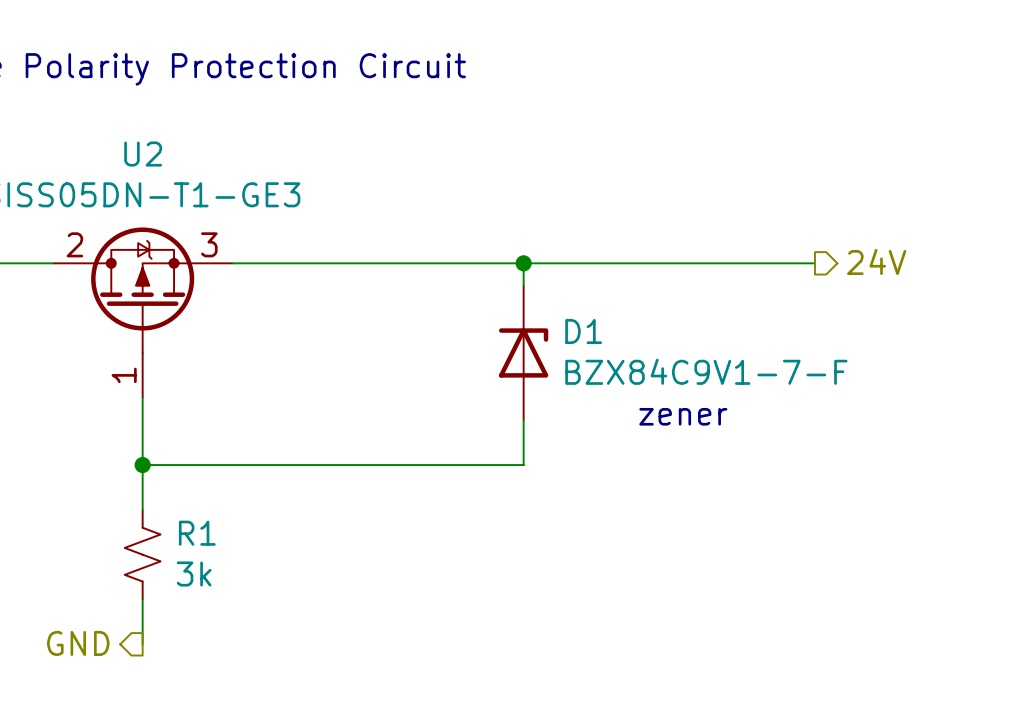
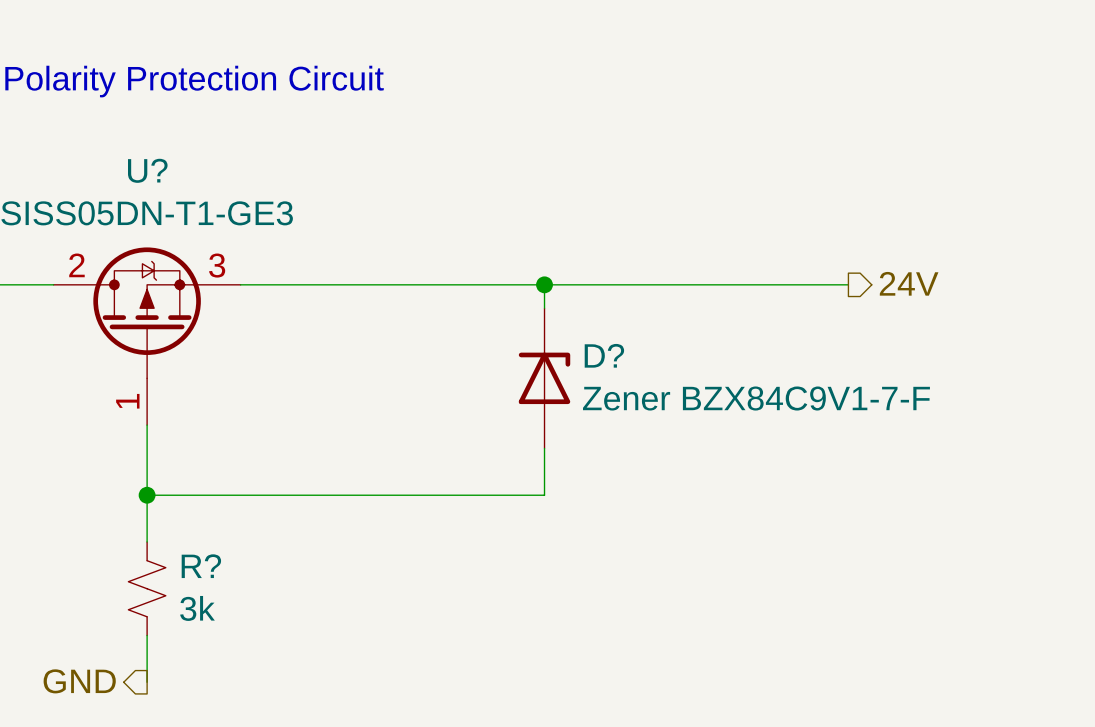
U2 name: U2 (143, 154) -> U? (147, 170)
D1 name: D1 (583, 331) -> D? (604, 355)
D1 value: BZX84C9V1-7-F (706, 371) -> Zener BZX84C9V1-7-F (756, 398)
text: zener (683, 416) -> none
R1 name: R1 (197, 533) -> R? (201, 566)

